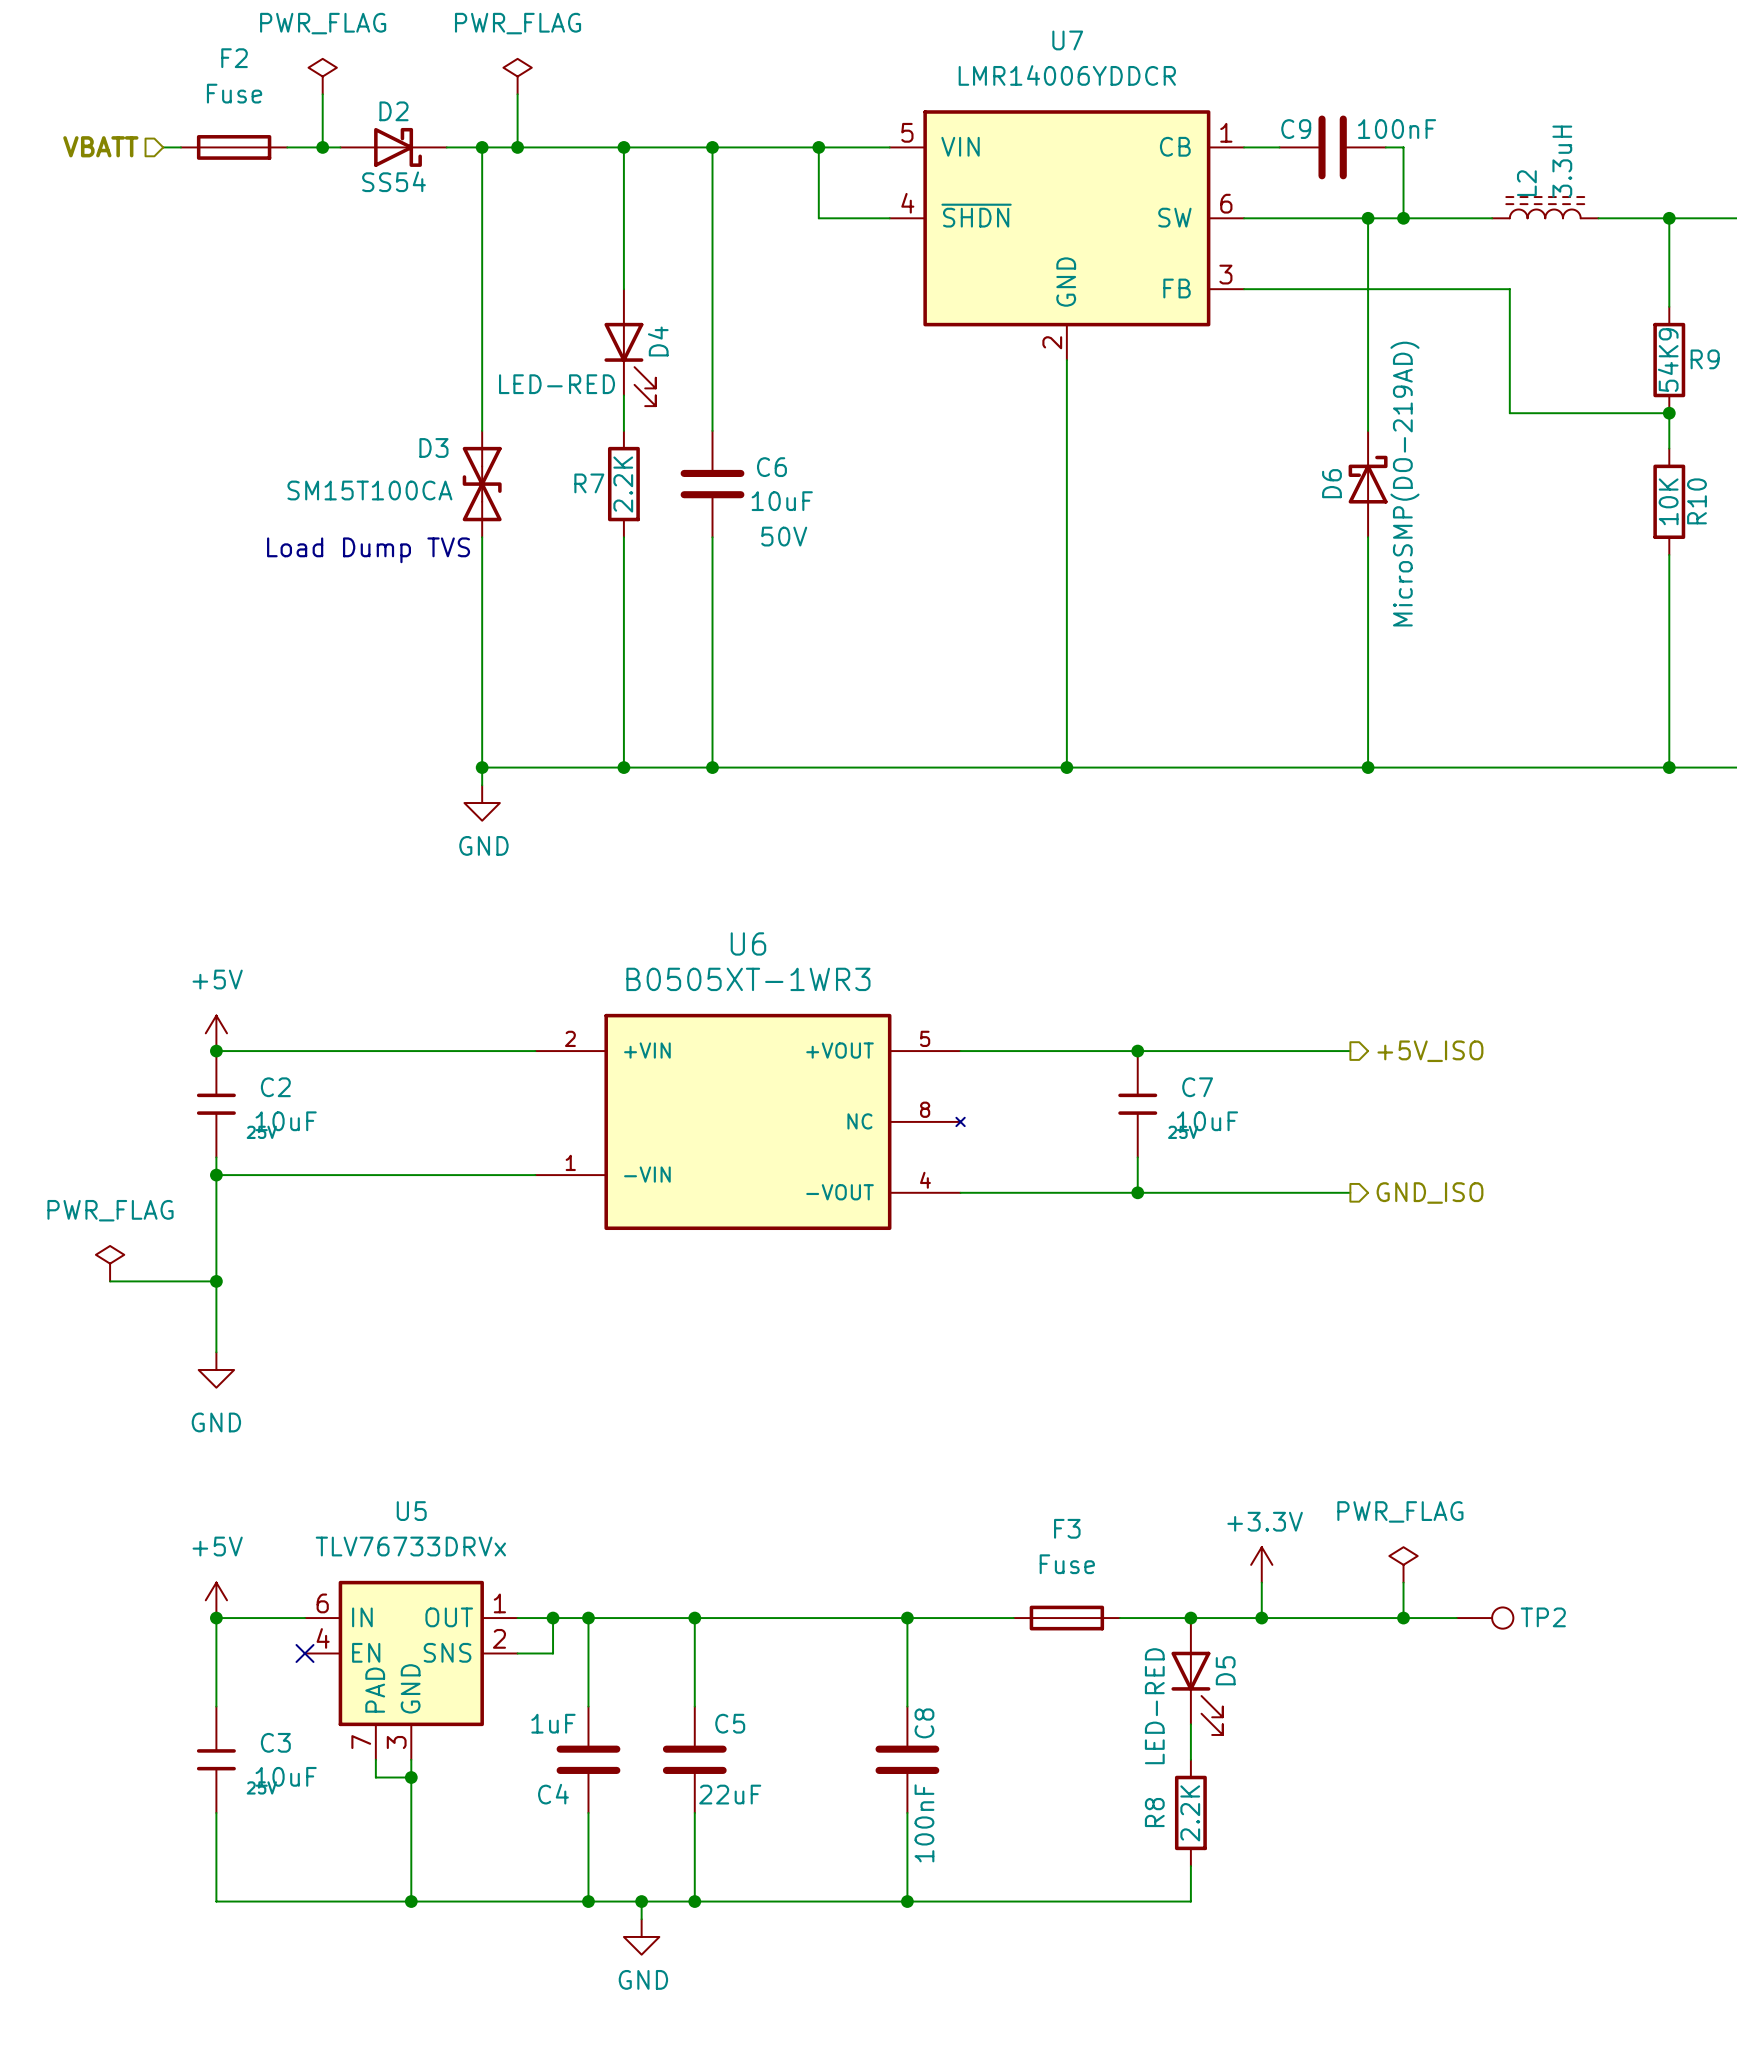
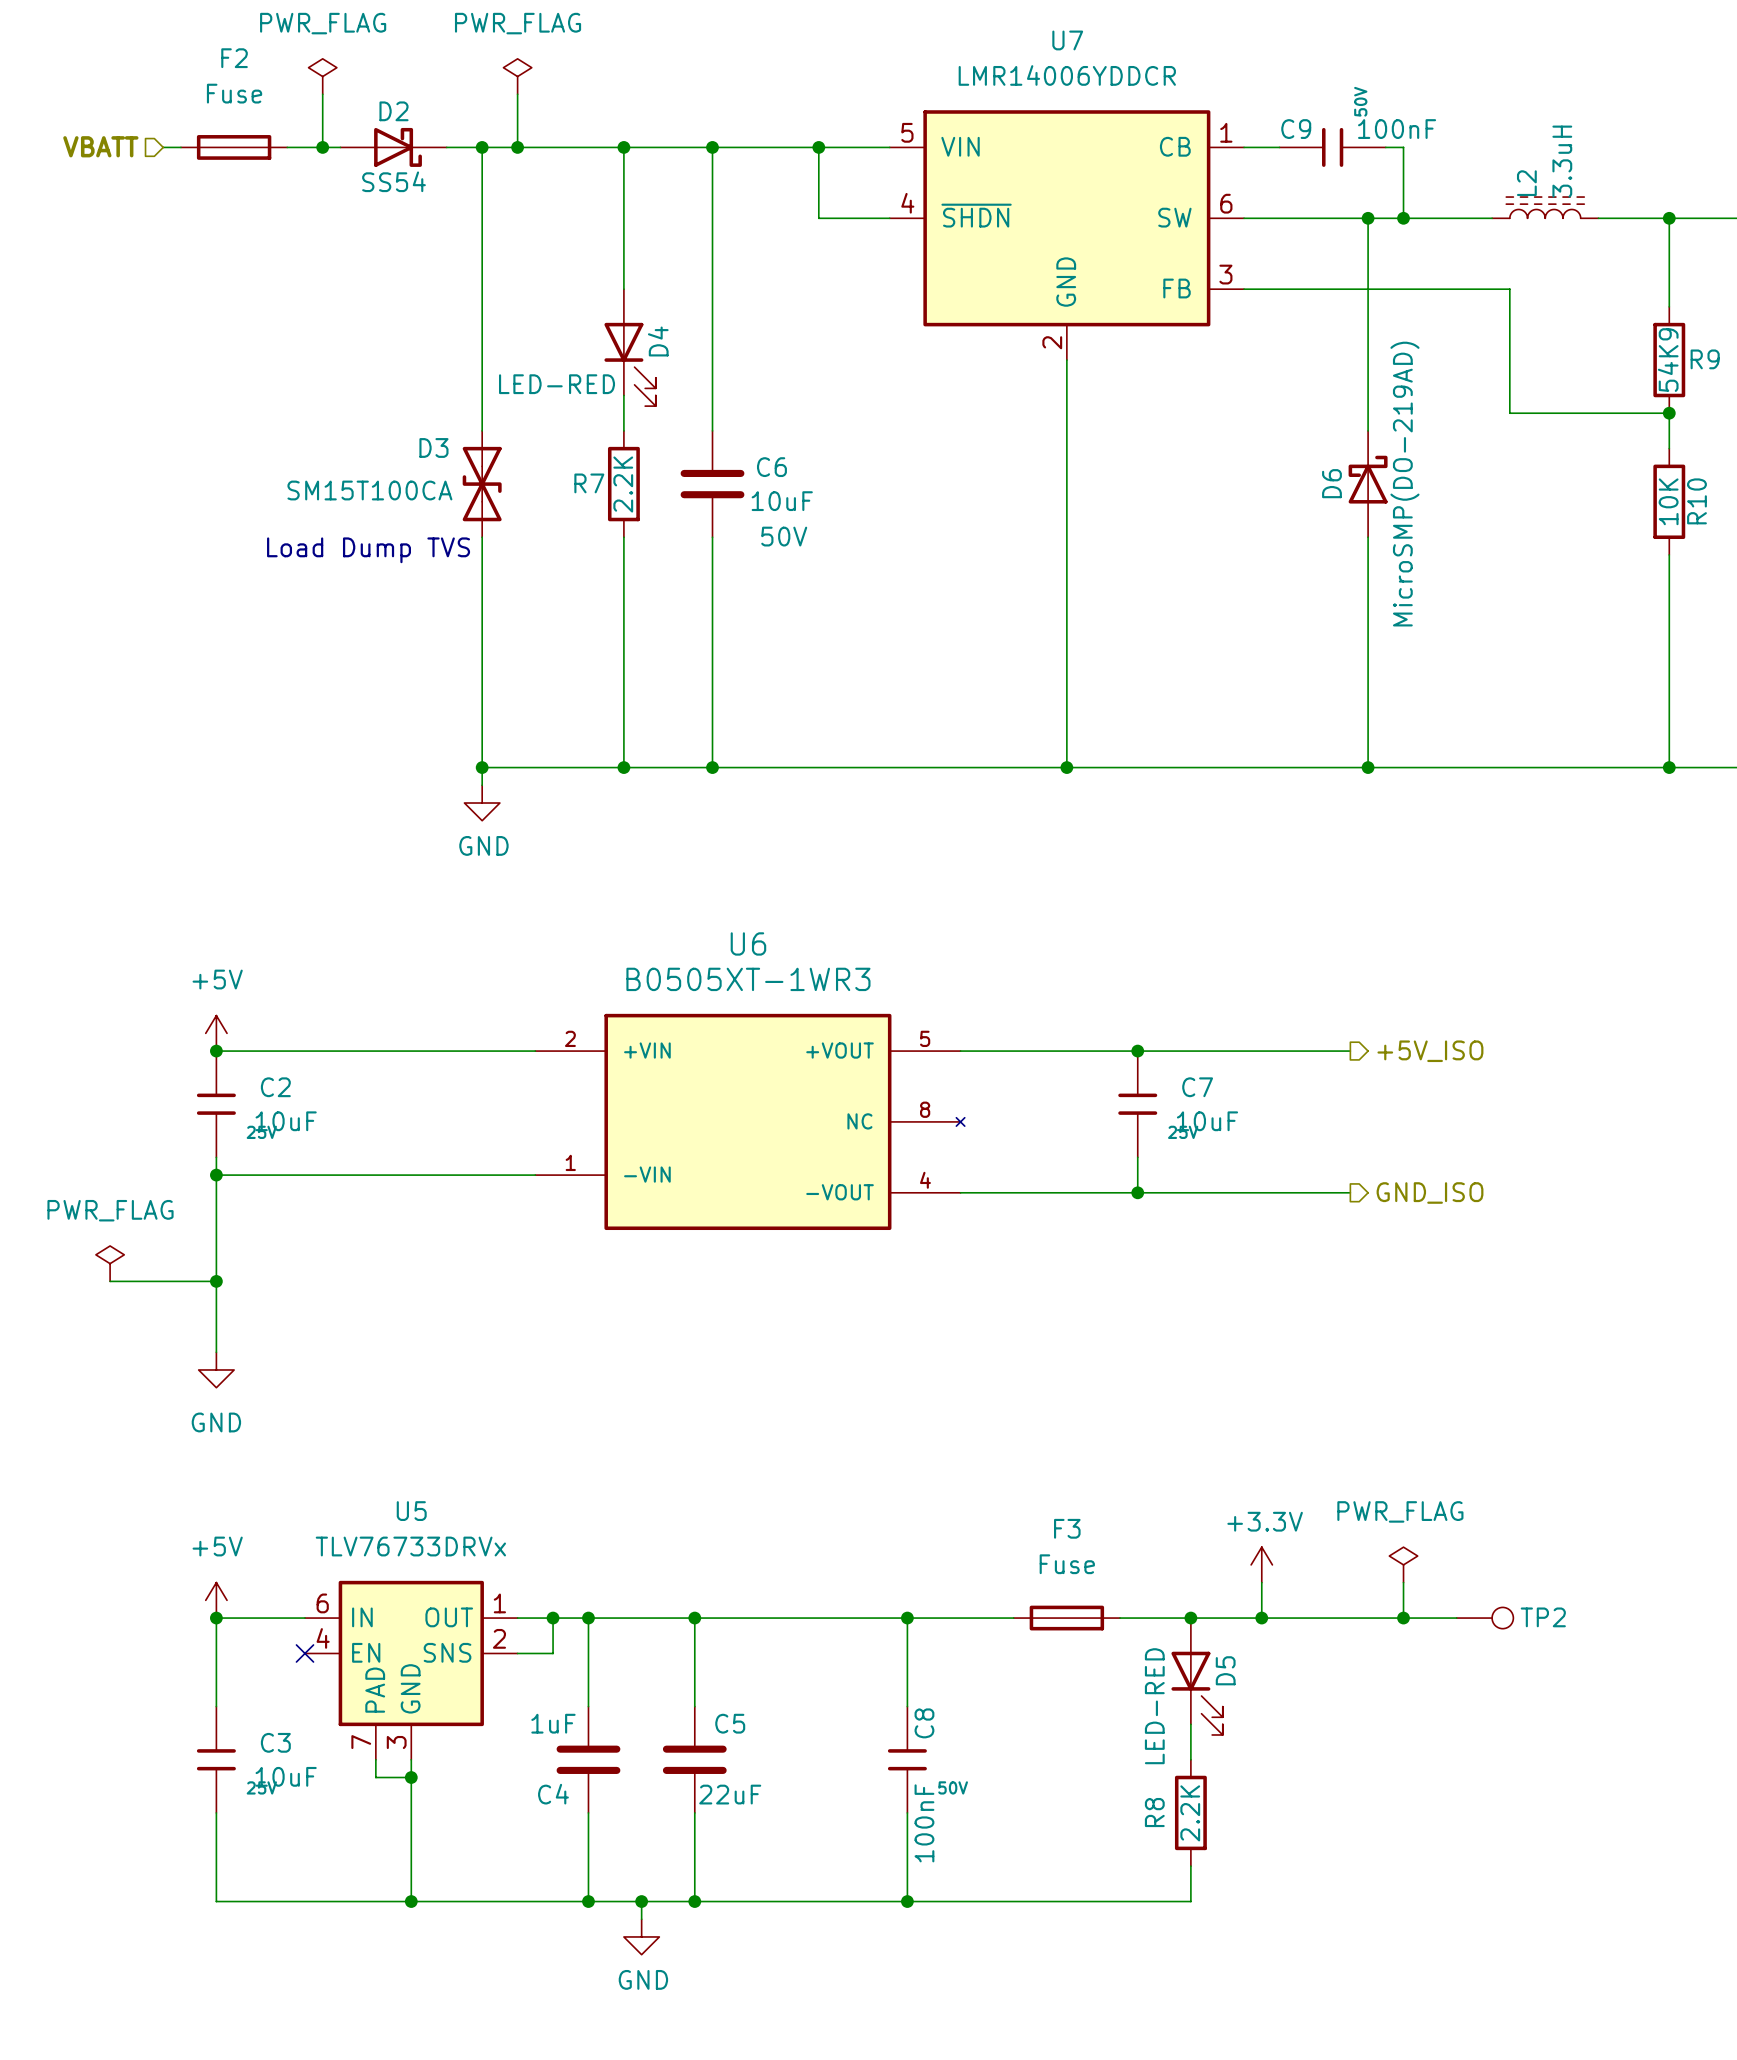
C9 text: none -> 50V (1360, 101)
C9 symbol: [1279, 115, 1386, 180] -> [1279, 127, 1386, 167]
C8 symbol: [875, 1706, 940, 1813] -> [887, 1706, 927, 1813]
C8 text: none -> 50V (953, 1787)

